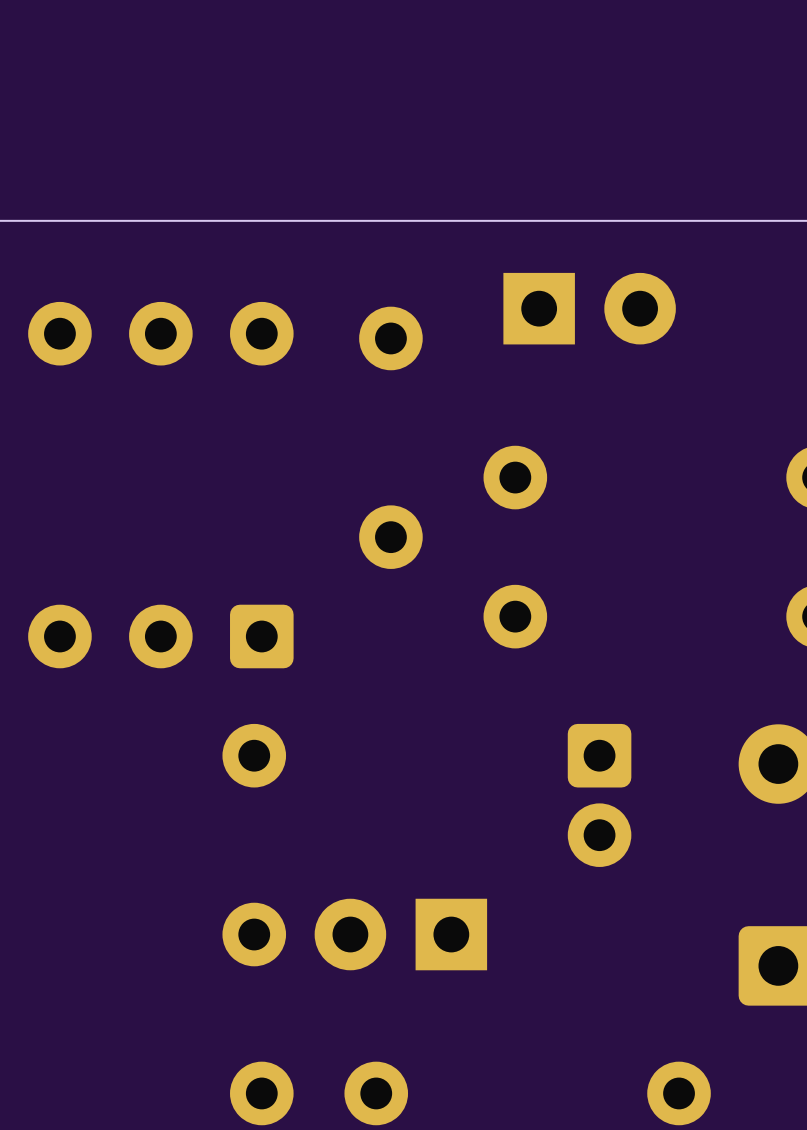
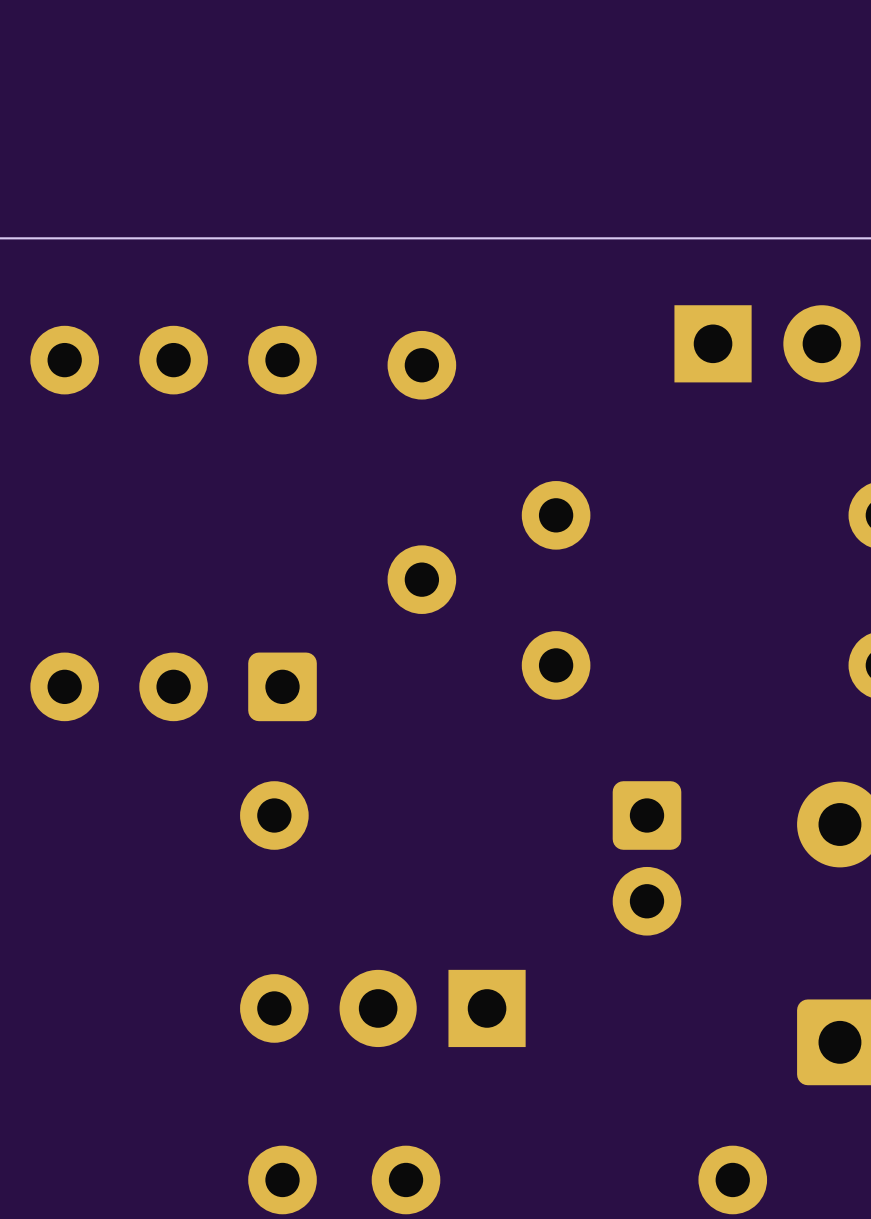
part position: (589, 308) -> (767, 343)

